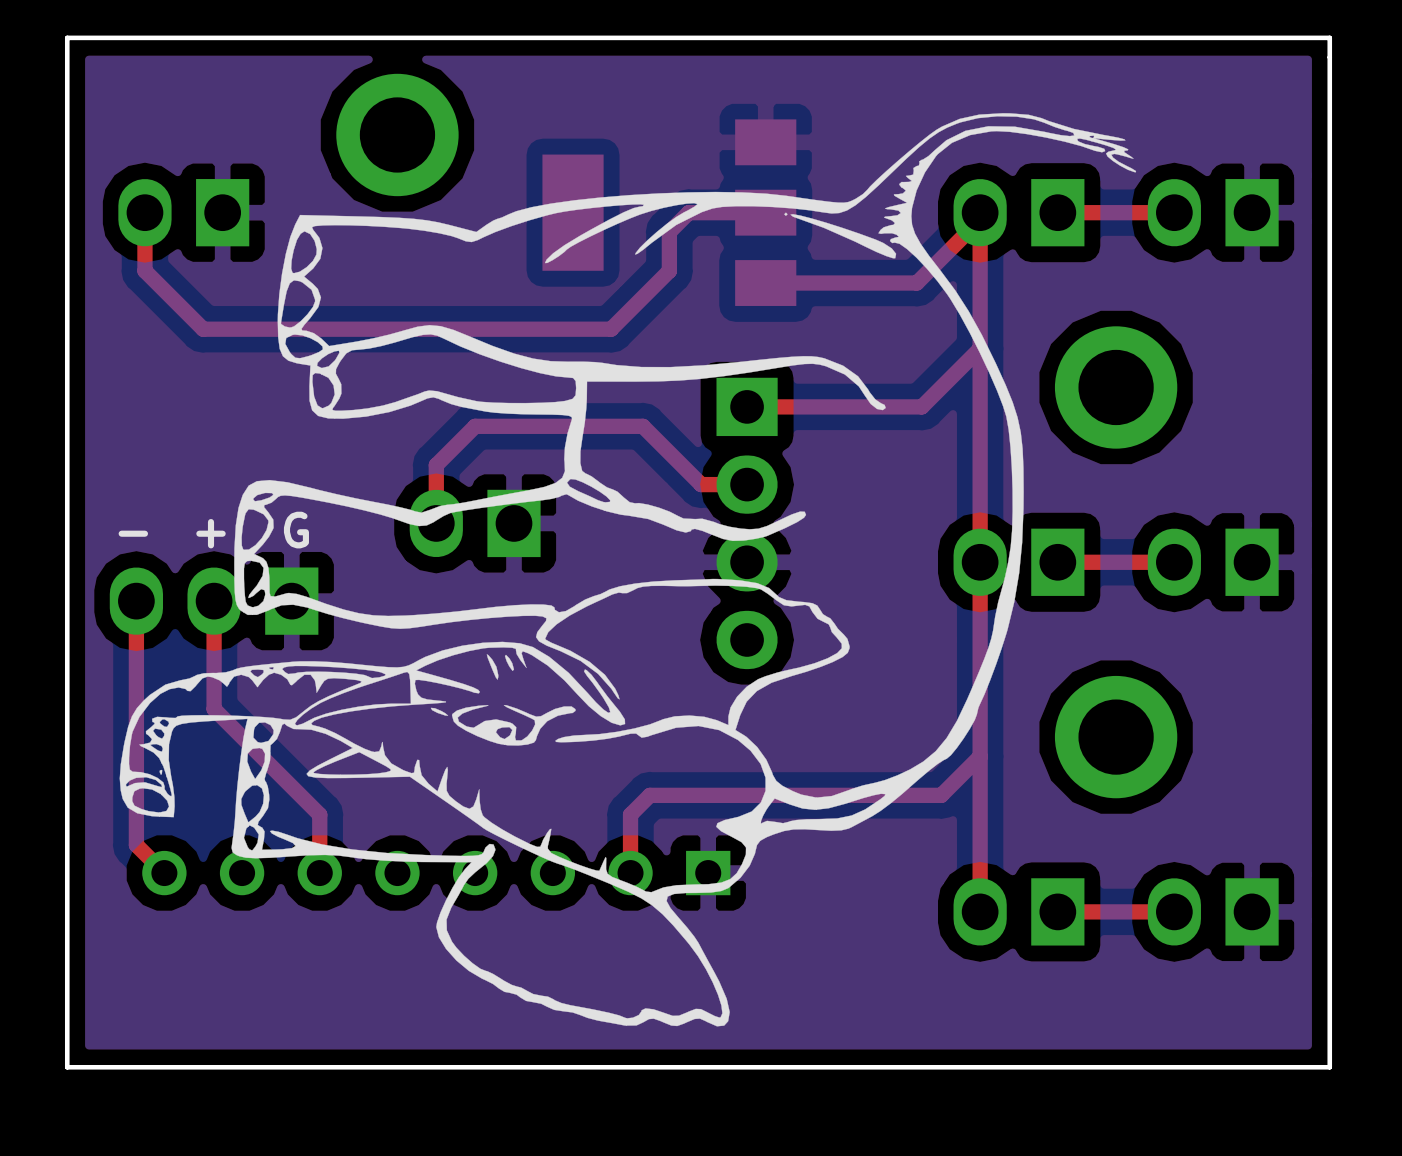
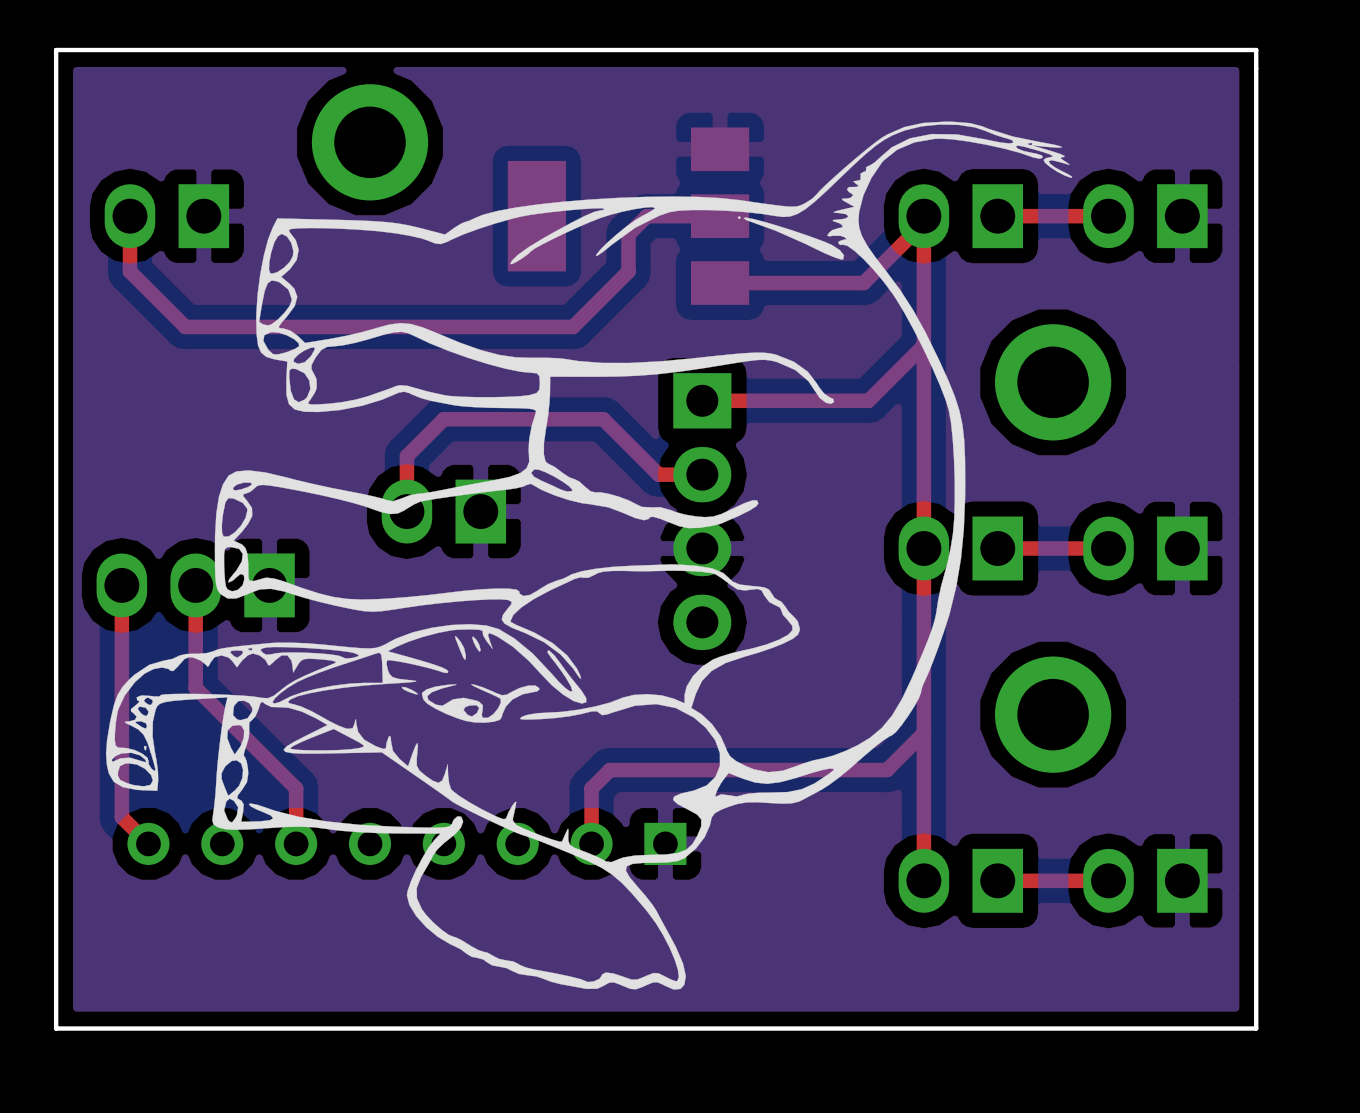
text: G (296, 530) -> none
text: - (133, 533) -> none
text: + (211, 533) -> none

